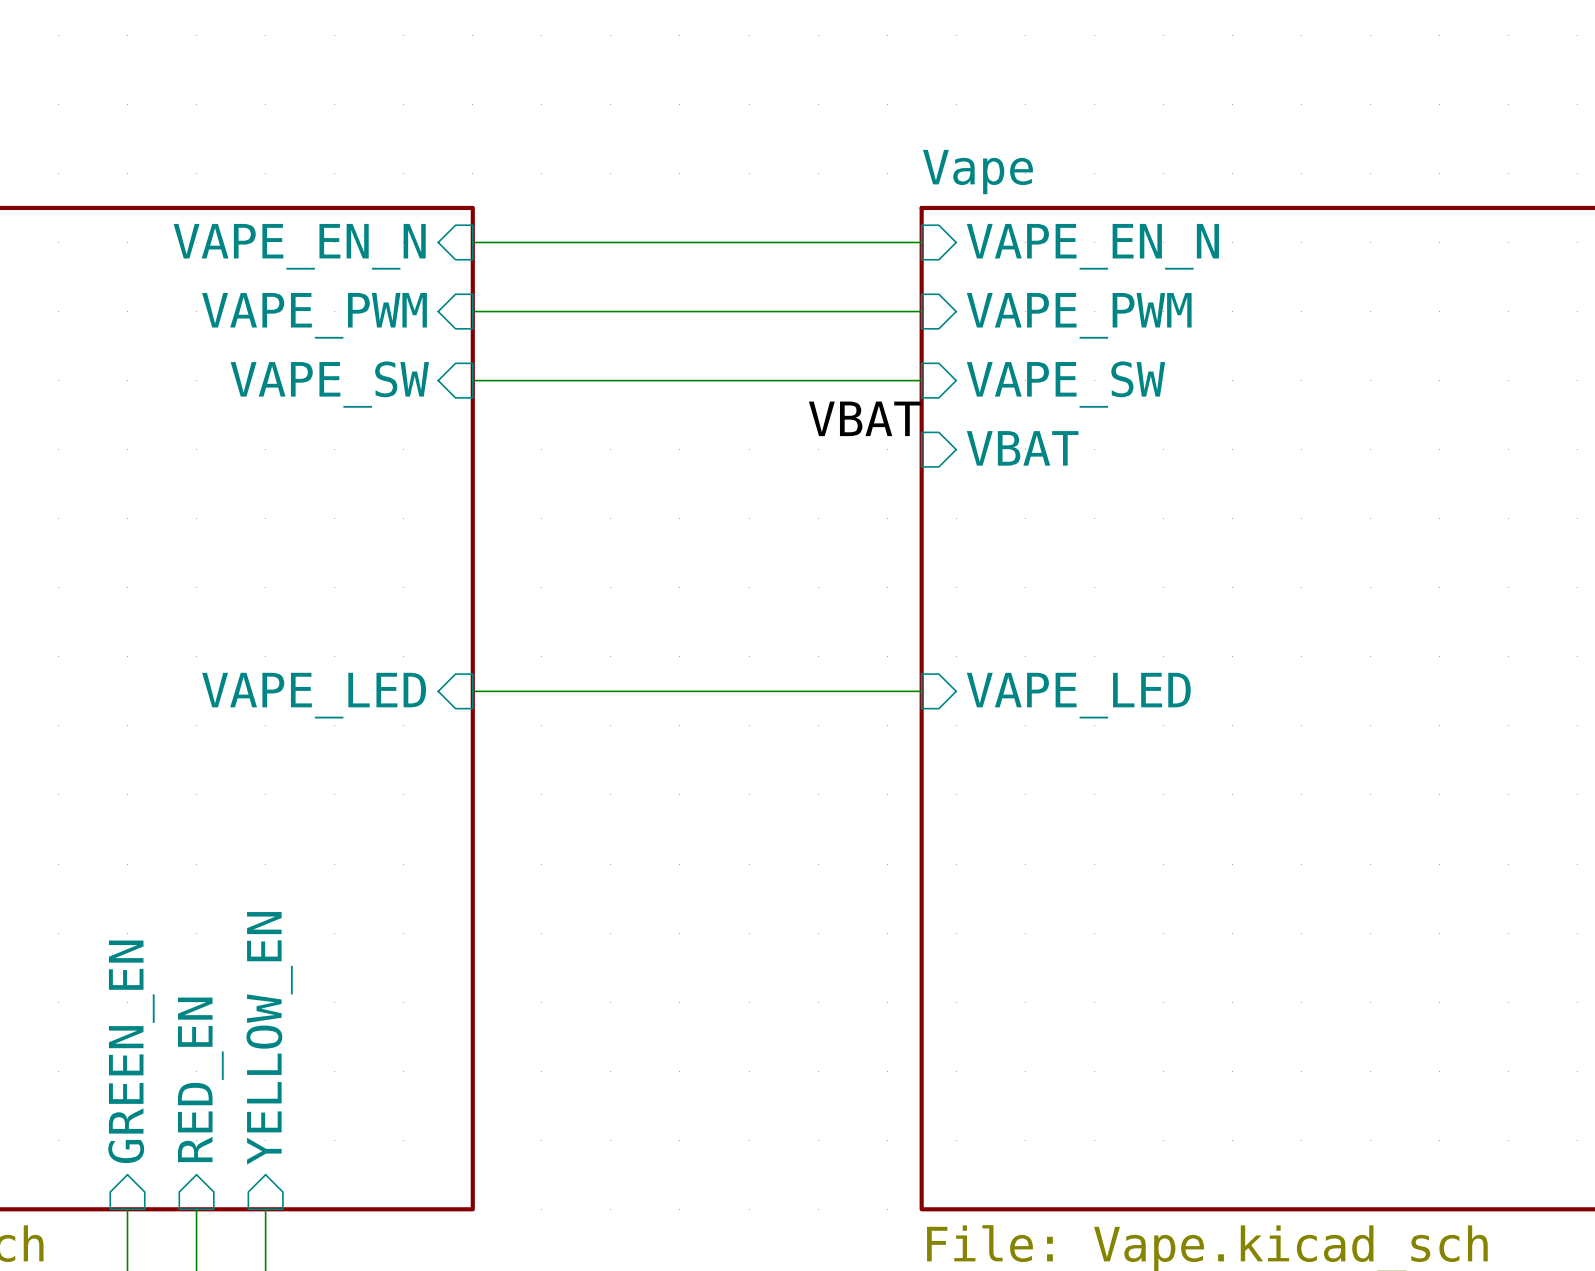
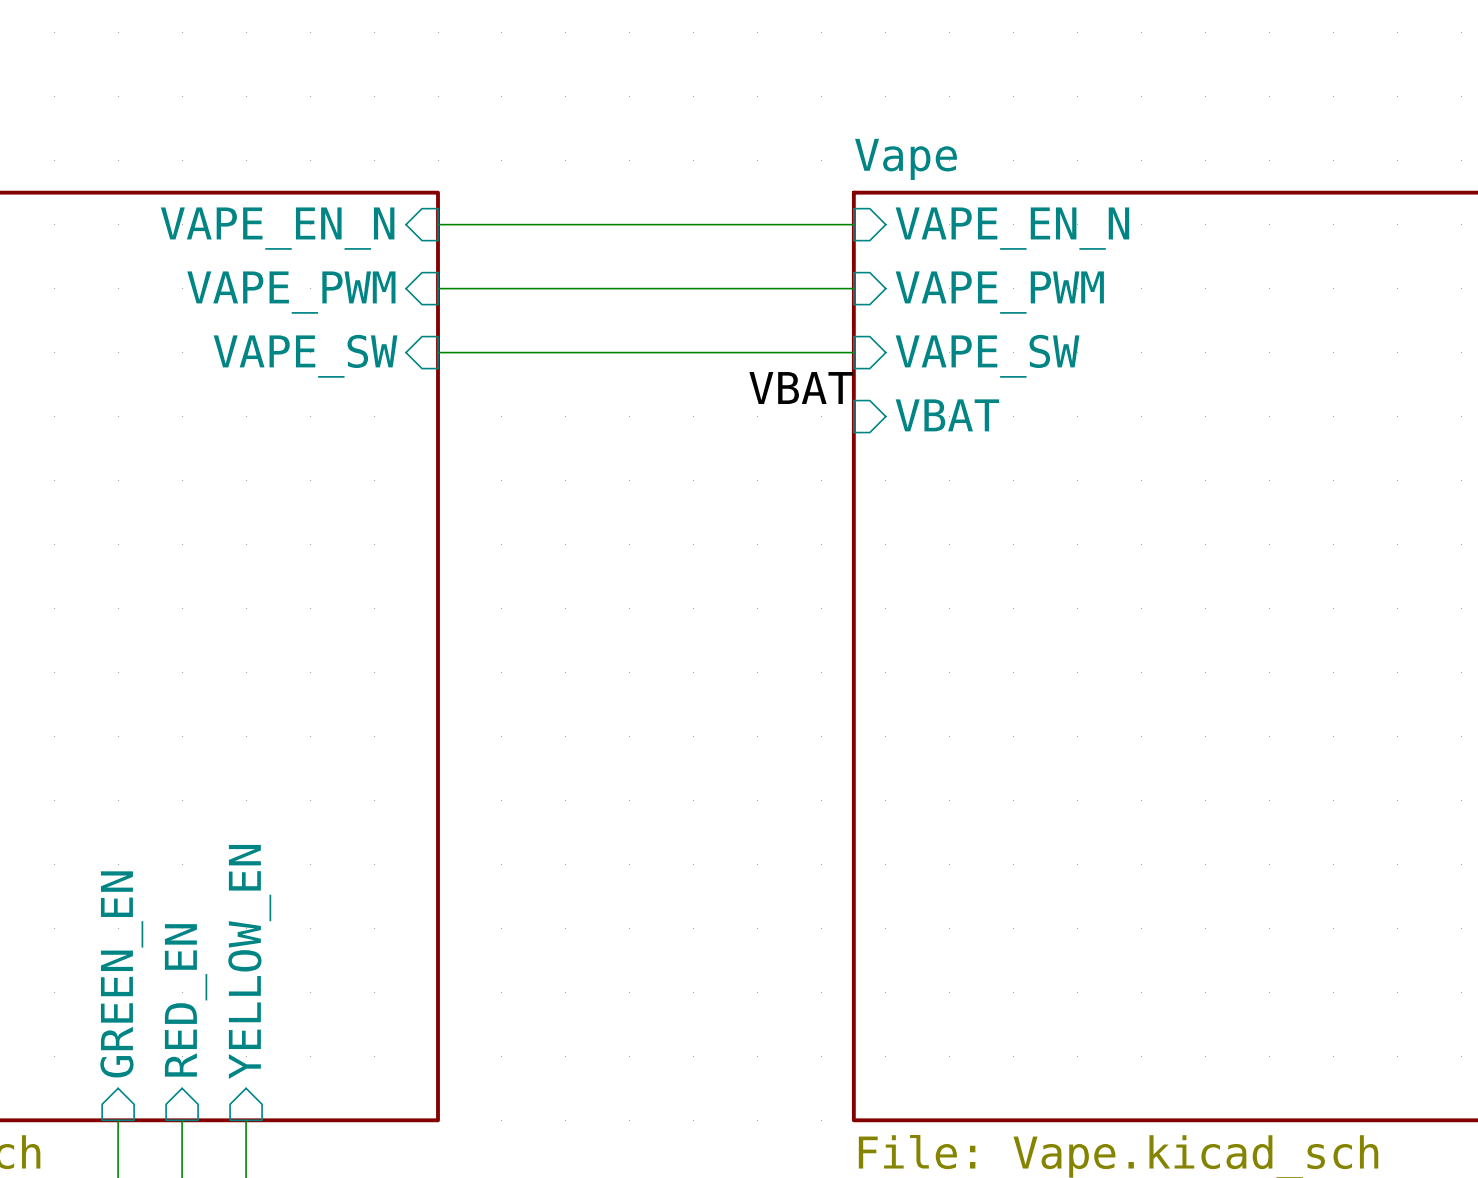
wire: (472, 691) (921, 691) -> none
sheet pin: VAPE_LED (314, 695) -> none
sheet pin: VAPE_LED (1078, 695) -> none

